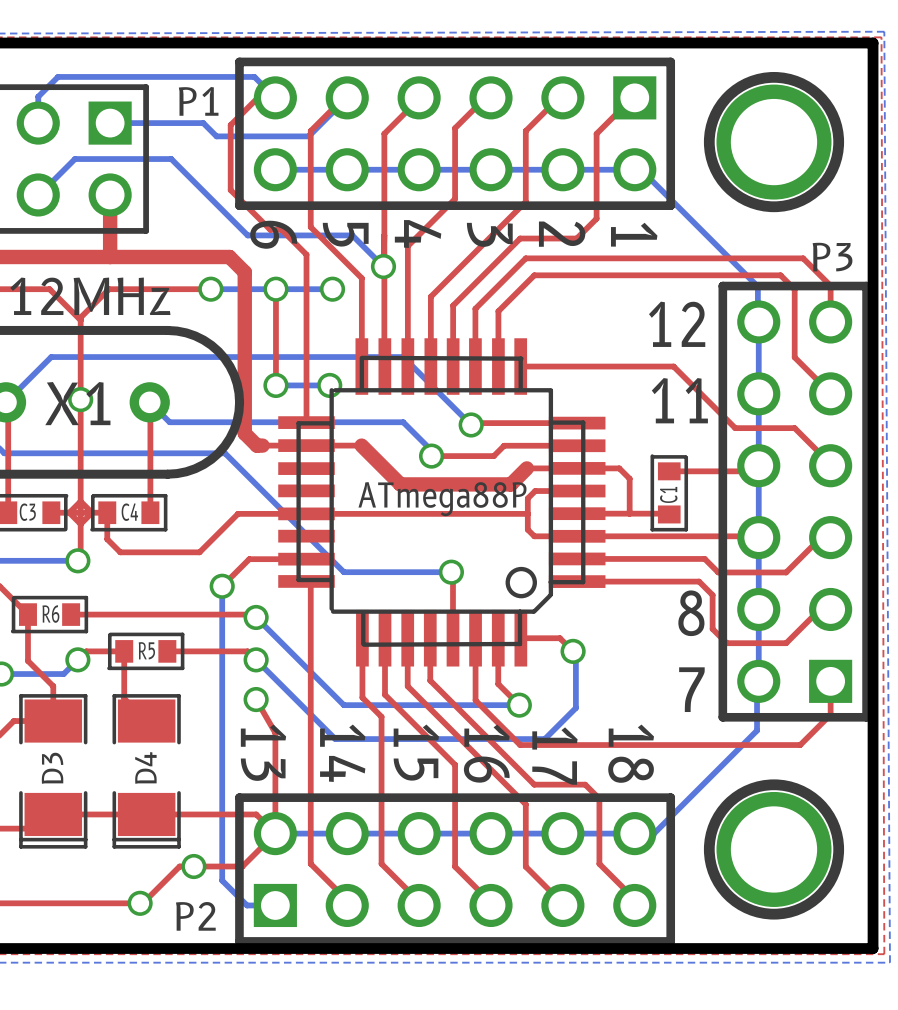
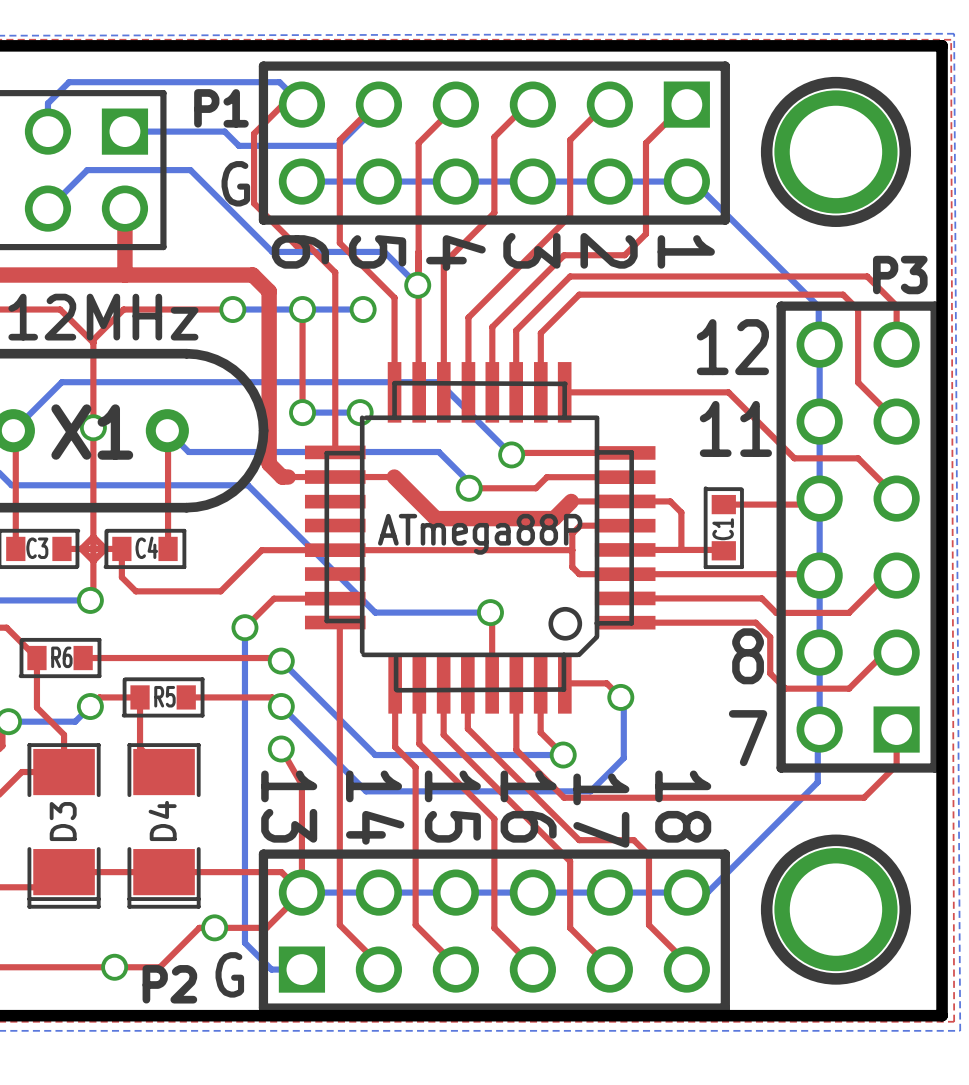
text: none -> G (235, 183)
via position: (140, 903) -> (114, 967)
text: none -> G (229, 974)
P2 name position: P2 (195, 916) -> P2 (169, 984)

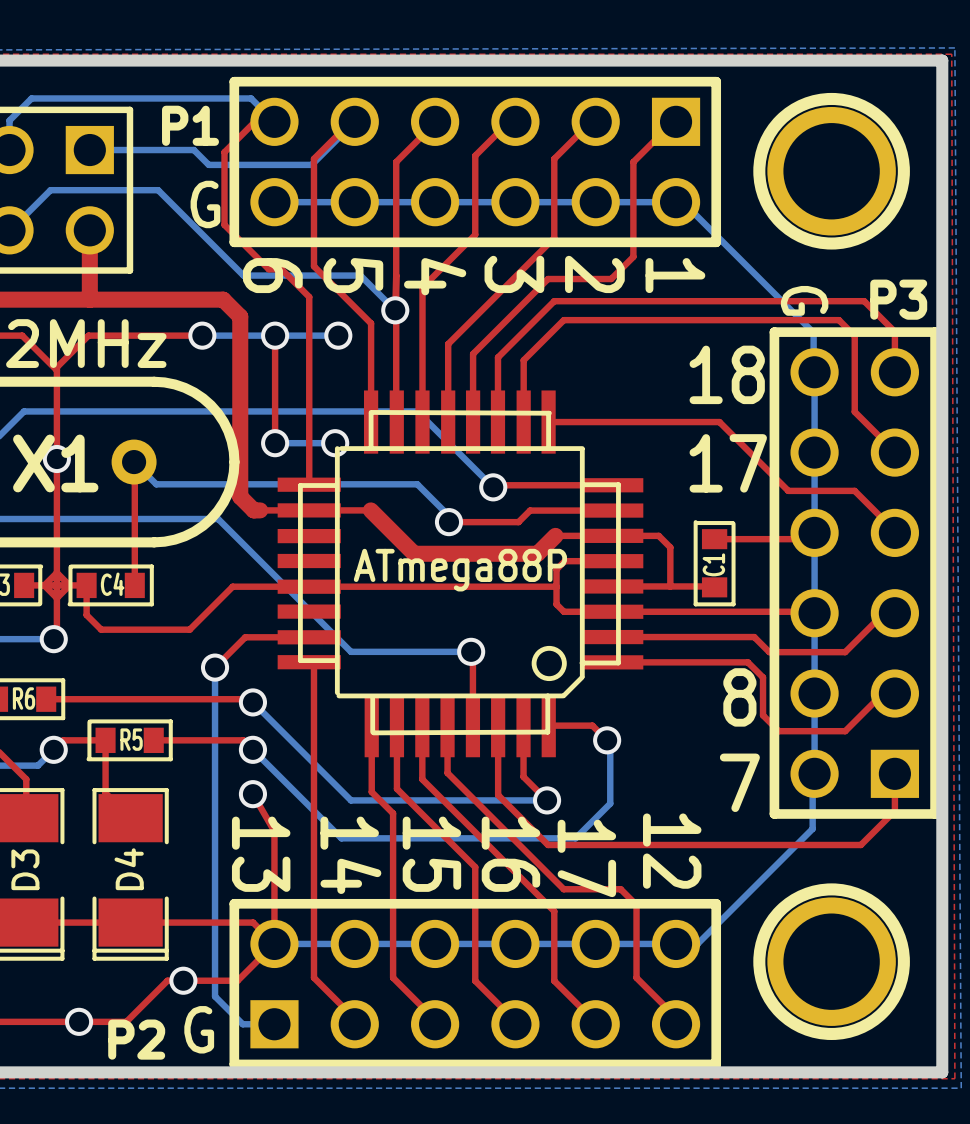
text: none -> G (804, 300)
text: 12 (732, 347) -> 18 (727, 374)
text: 11 (735, 428) -> 17 (728, 463)
text: 18 (683, 806) -> 12 (672, 851)

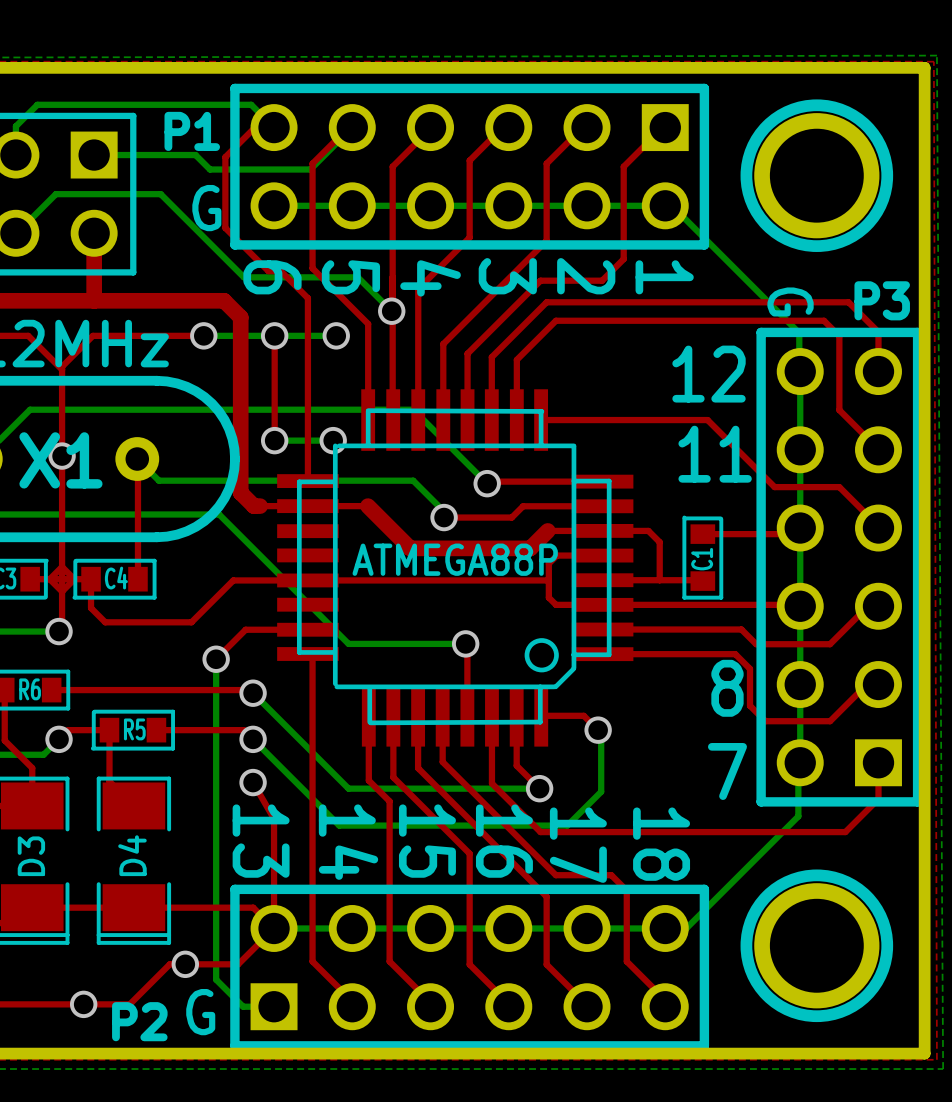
text rotation: 0° (727, 374) -> 90° clockwise (661, 844)
text position: 18 (727, 374) -> 18 (661, 844)
text: 17 (728, 463) -> 11 (715, 454)
part value: ATmega88P (460, 570) -> ATMEGA88P (455, 559)
text rotation: 0° (672, 851) -> 90° counterclockwise (709, 374)
text position: 12 (672, 851) -> 12 (709, 374)

